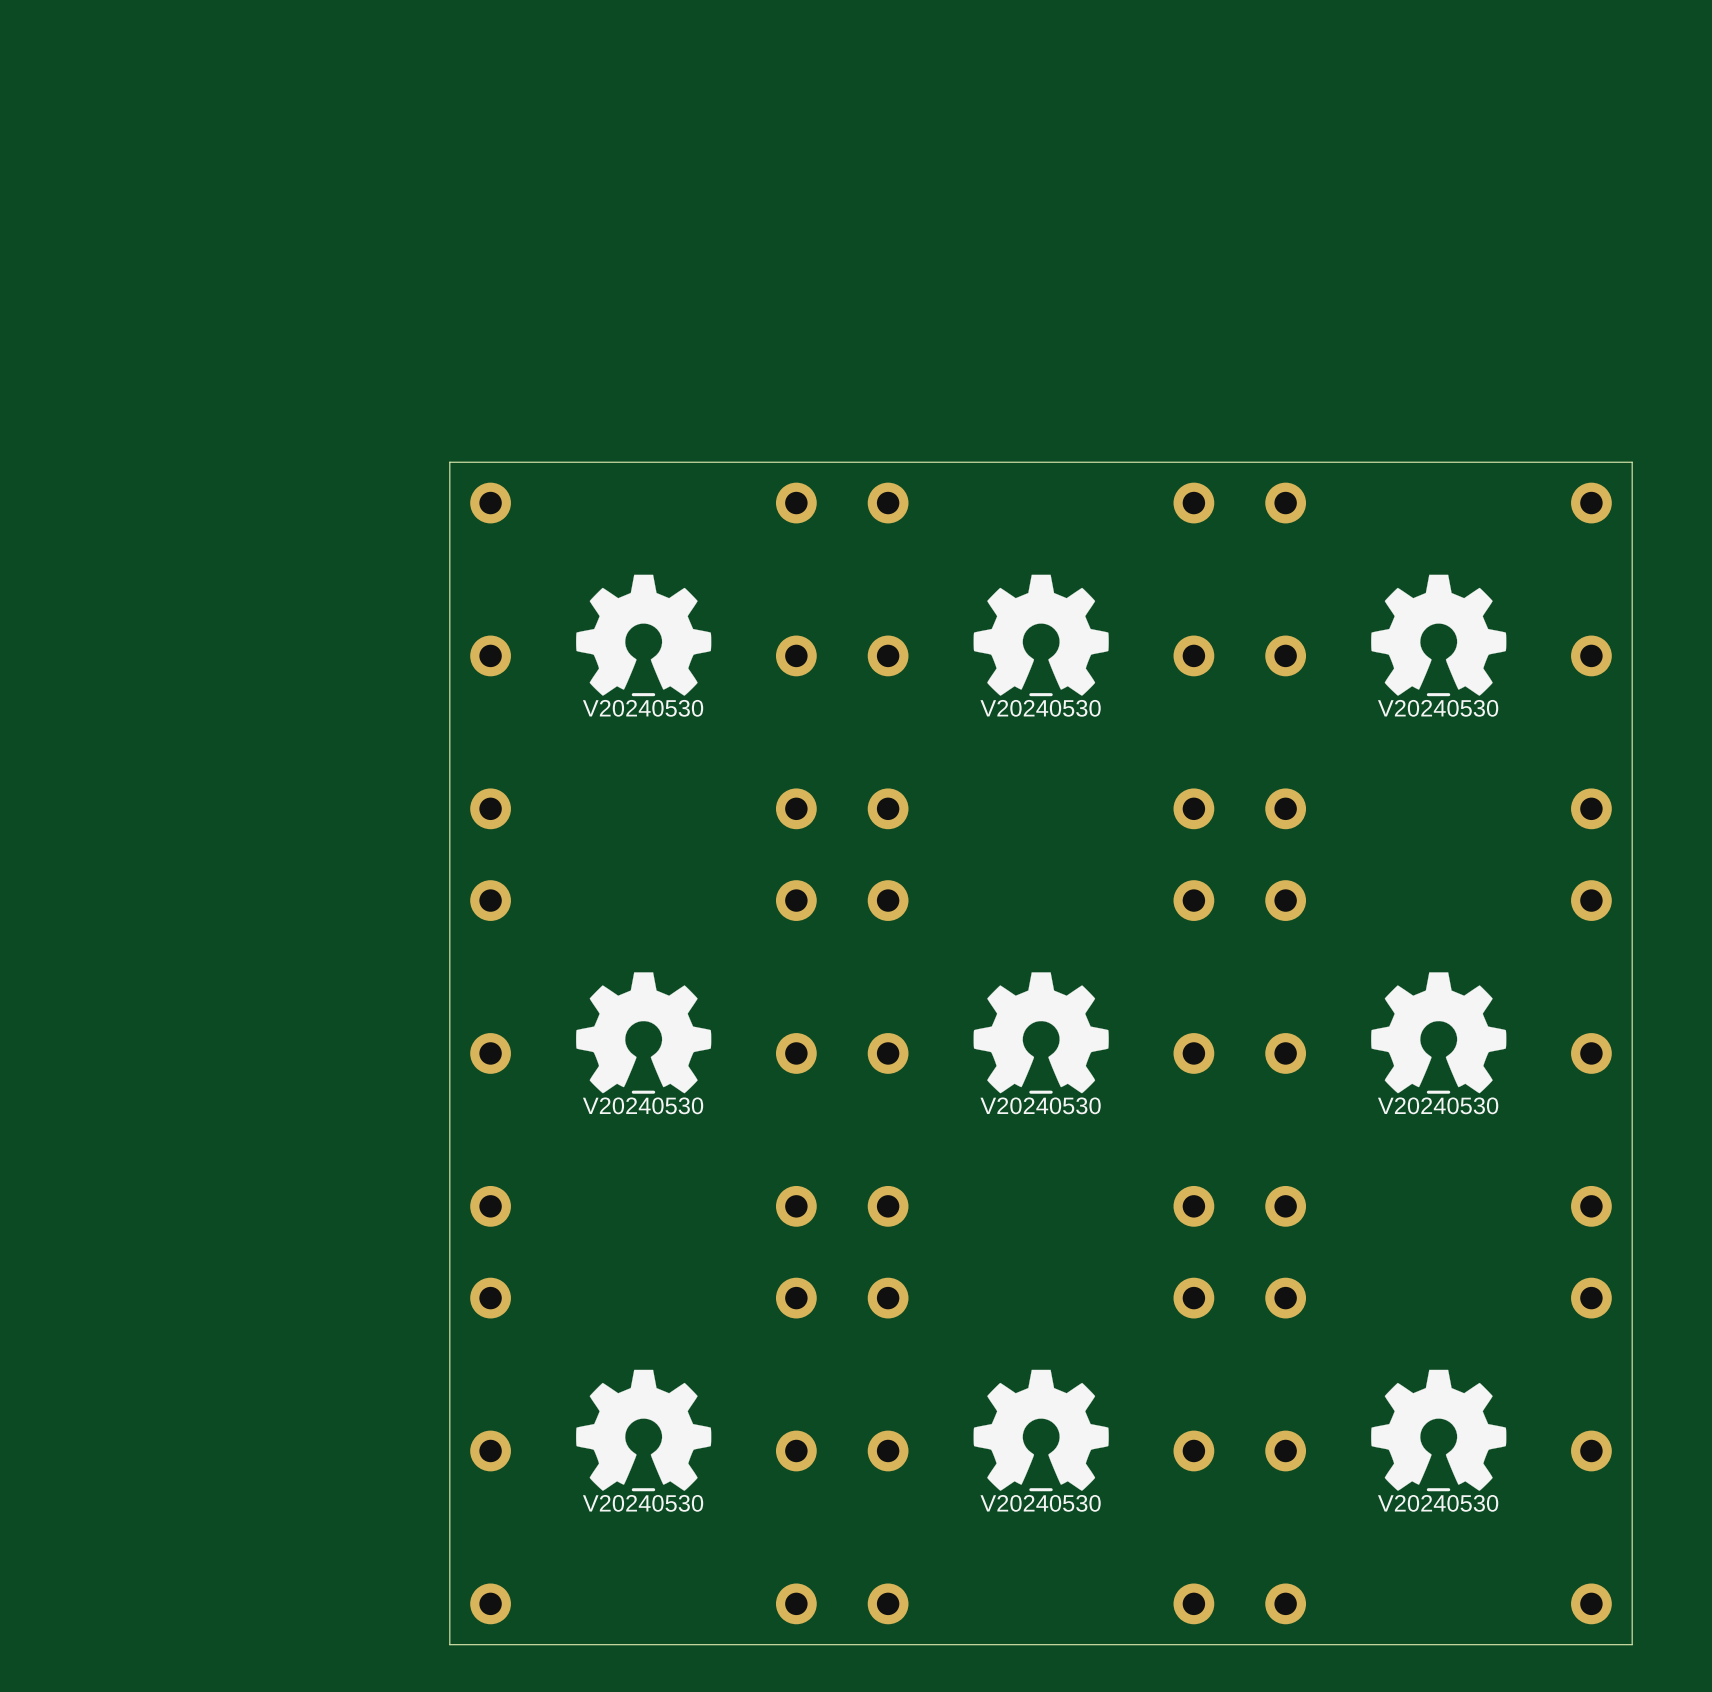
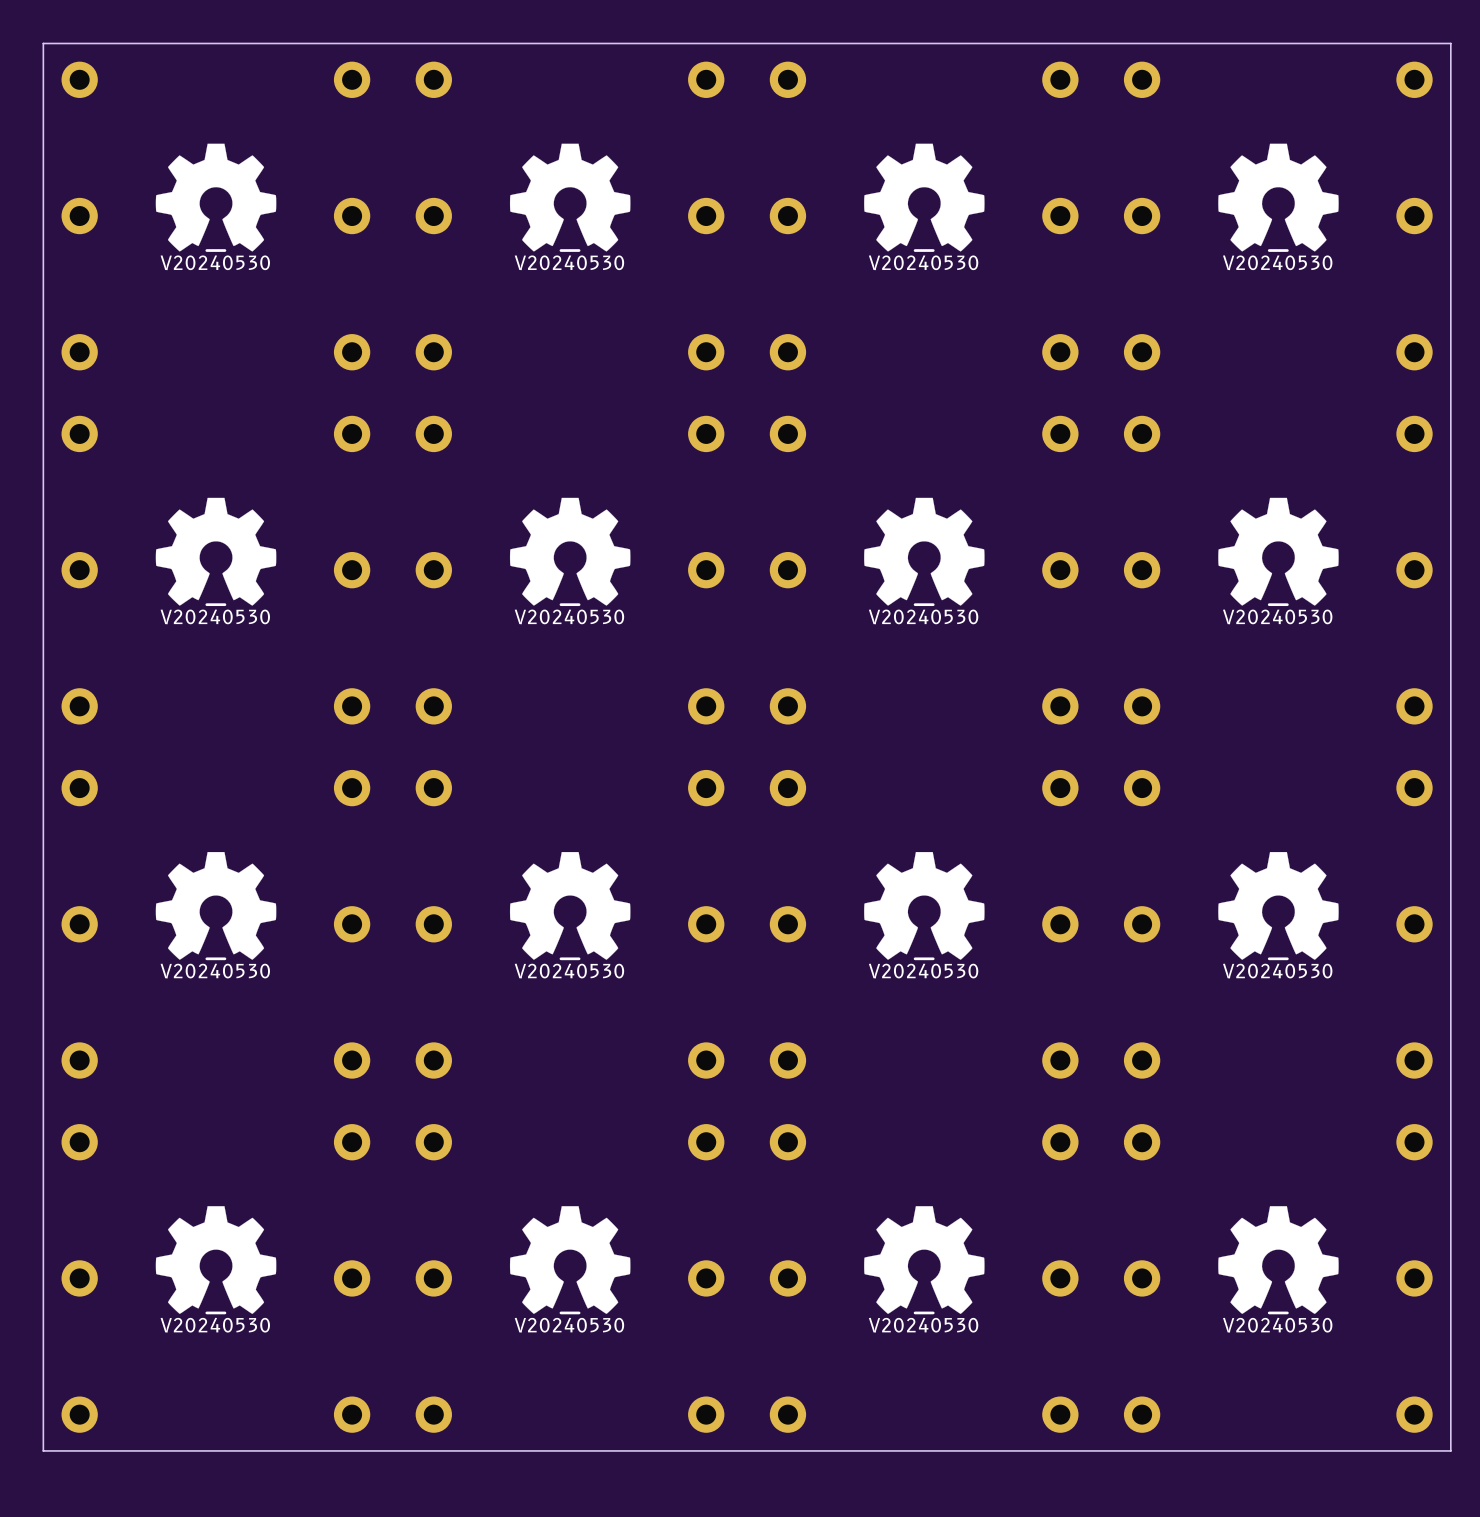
part: none -> (79, 79)
part: none -> (352, 79)
part: none -> (433, 79)
part: none -> (706, 79)
part: none -> (787, 79)
part: none -> (1060, 79)
part: none -> (1142, 79)
part: none -> (1414, 79)
drawing: none -> [155, 143, 277, 252]
drawing: none -> [509, 143, 631, 252]
drawing: none -> [864, 143, 985, 252]
drawing: none -> [1218, 143, 1339, 252]
part: none -> (79, 216)
part: none -> (352, 216)
part: none -> (433, 216)
part: none -> (706, 216)
part: none -> (787, 216)
part: none -> (1060, 216)
part: none -> (1142, 216)
part: none -> (1414, 216)
part: none -> (79, 352)
part: none -> (352, 352)
part: none -> (433, 352)
part: none -> (706, 352)
part: none -> (787, 352)
part: none -> (1060, 352)
part: none -> (1142, 352)
part: none -> (1414, 352)
board edge: (1632, 462) (449, 462) (449, 1644) -> (1450, 397) (1450, 43) (43, 43) (43, 1450) (397, 1450)
part: none -> (79, 433)
part: none -> (352, 433)
drawing: none -> [155, 497, 277, 607]
part: none -> (79, 570)
part: none -> (352, 570)
part: none -> (79, 706)
part: none -> (352, 706)
part: none -> (79, 788)
part: none -> (352, 788)
drawing: none -> [155, 852, 277, 961]
part: none -> (79, 924)
part: none -> (352, 924)
part: none -> (79, 1060)
part: none -> (352, 1060)
part: none -> (79, 1142)
part: none -> (352, 1142)
drawing: none -> [155, 1206, 277, 1315]
part: none -> (79, 1278)
part: none -> (352, 1278)
part: none -> (79, 1414)
part: none -> (352, 1414)

